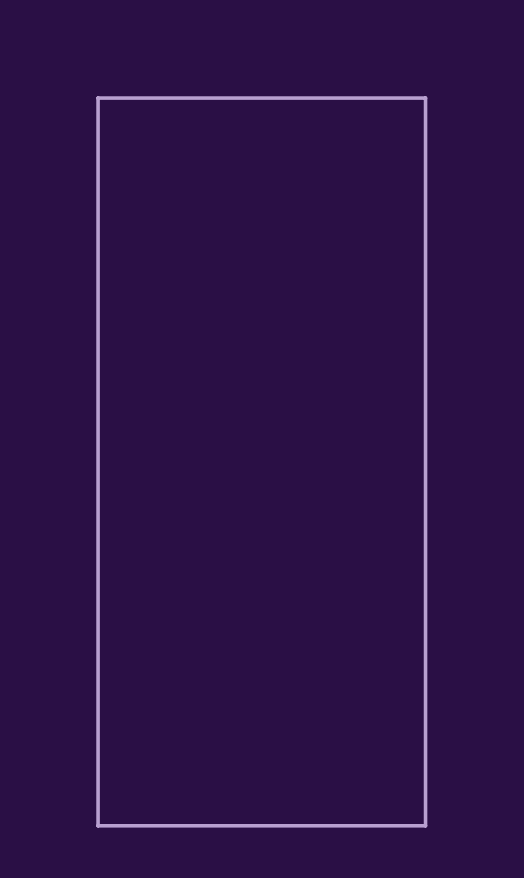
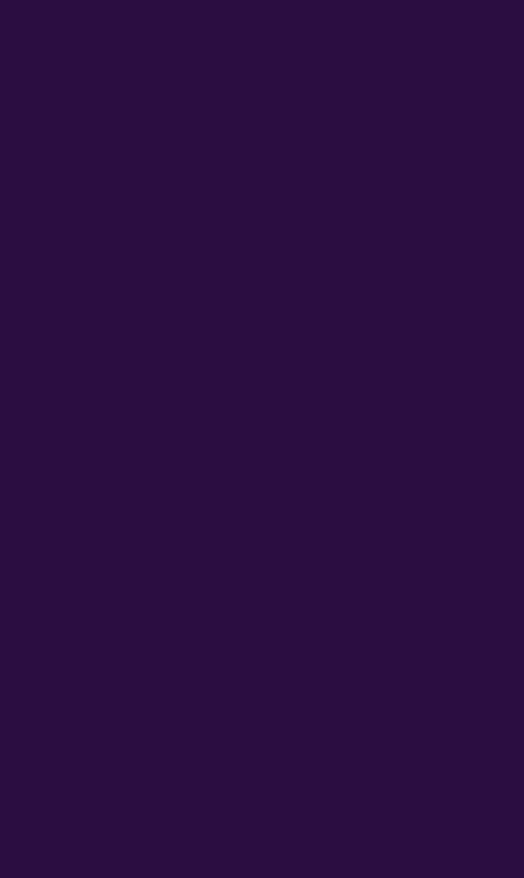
line: (98, 98) (425, 98) (425, 825) (98, 825) (98, 98) -> none

